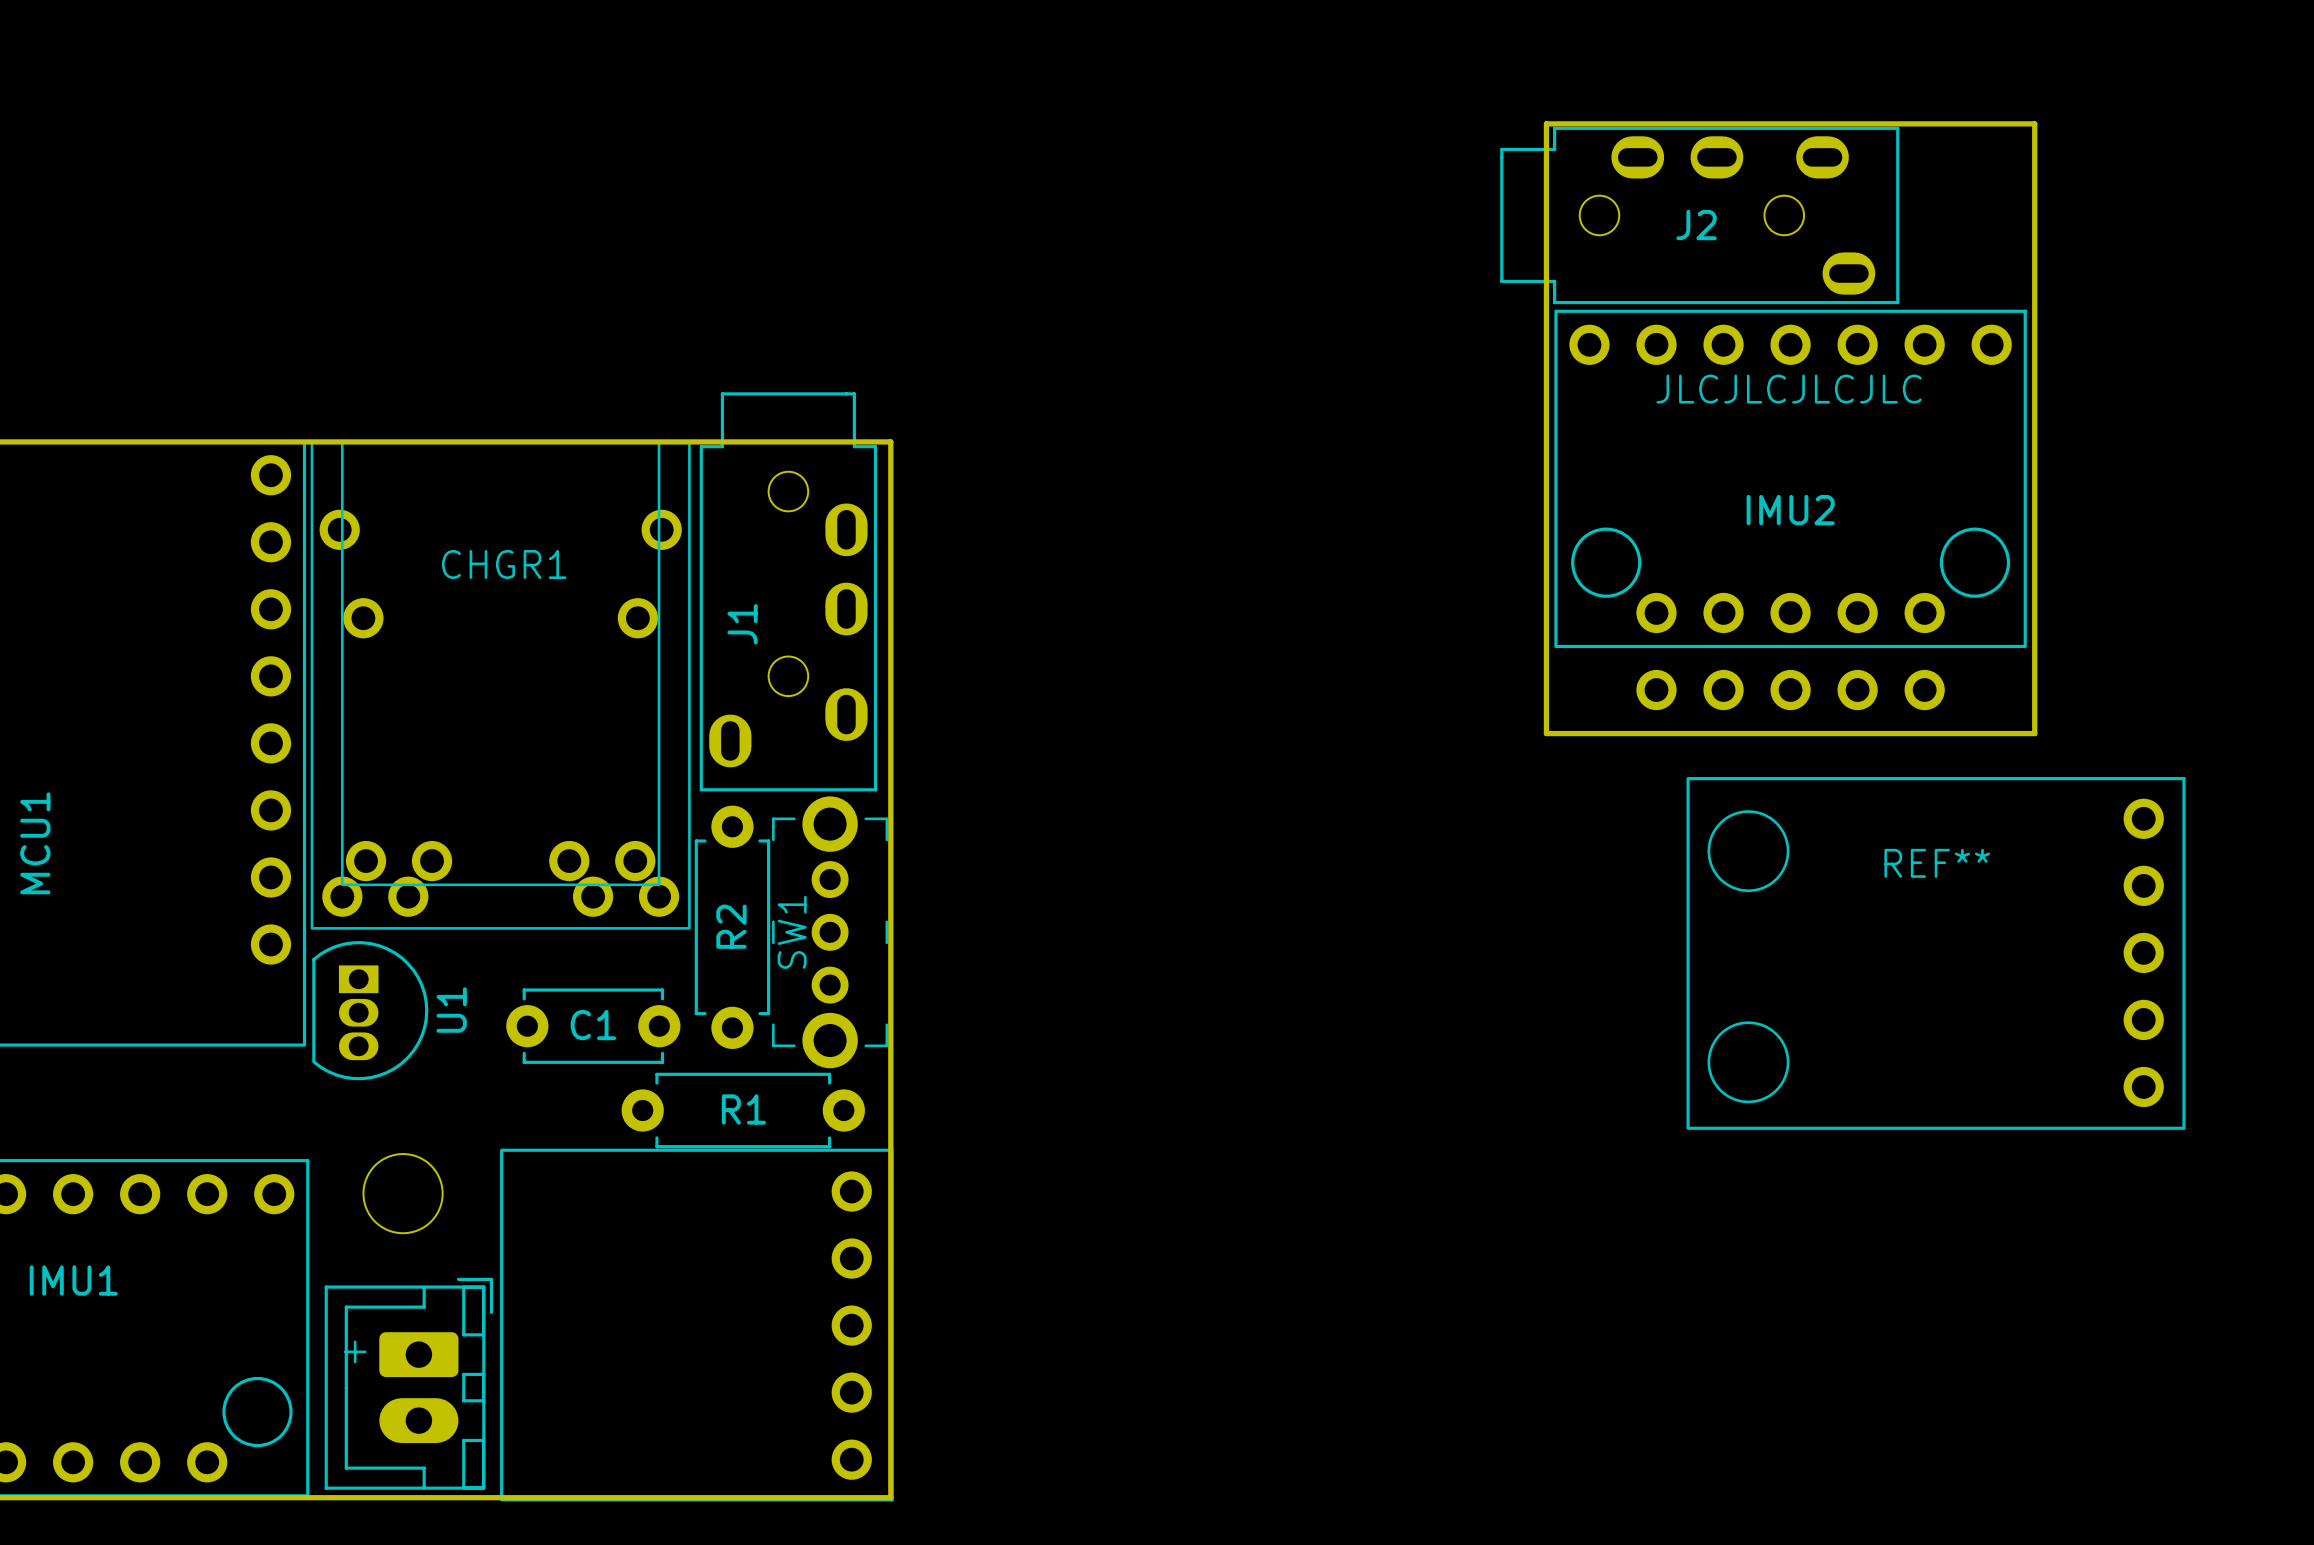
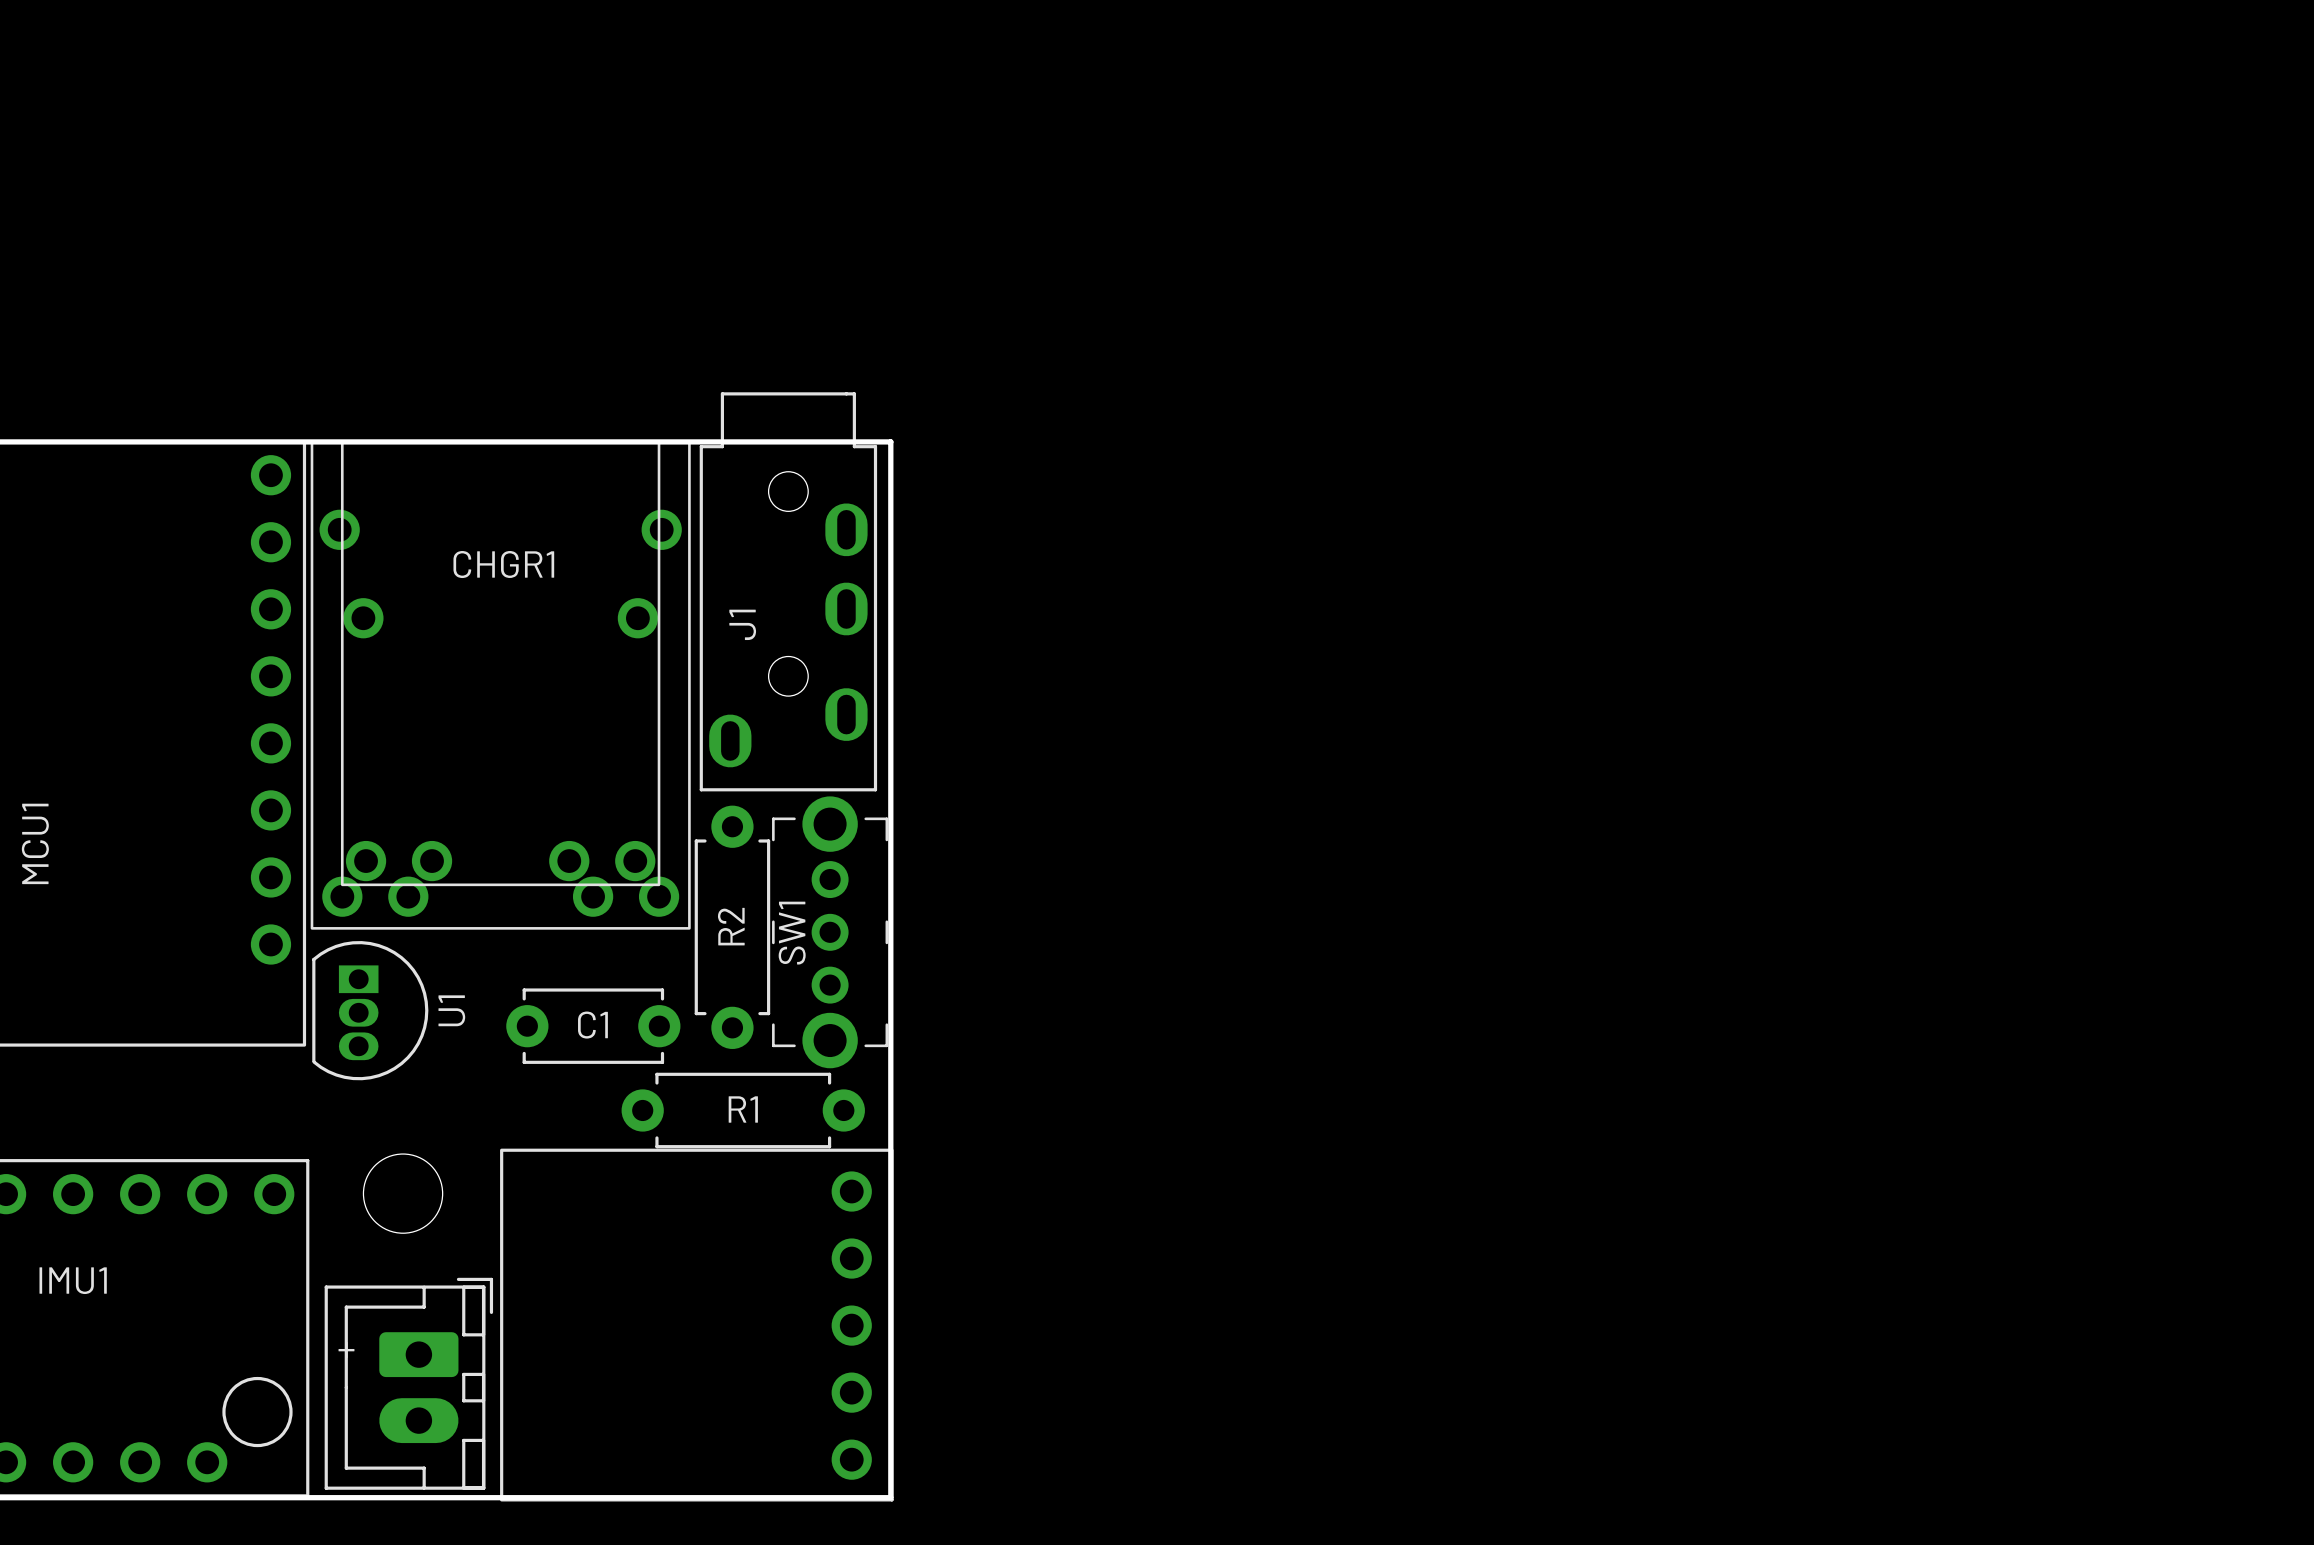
board edge: (1546, 123) (2034, 123) (2034, 733) (1546, 733) (1546, 123) -> none
J2: (1699, 215) -> none
text: JLCJLCJLCJLC (1789, 389) -> none
IMU2: (1790, 478) -> none
part: (1790, 690) -> none
REF**: (1936, 953) -> none

